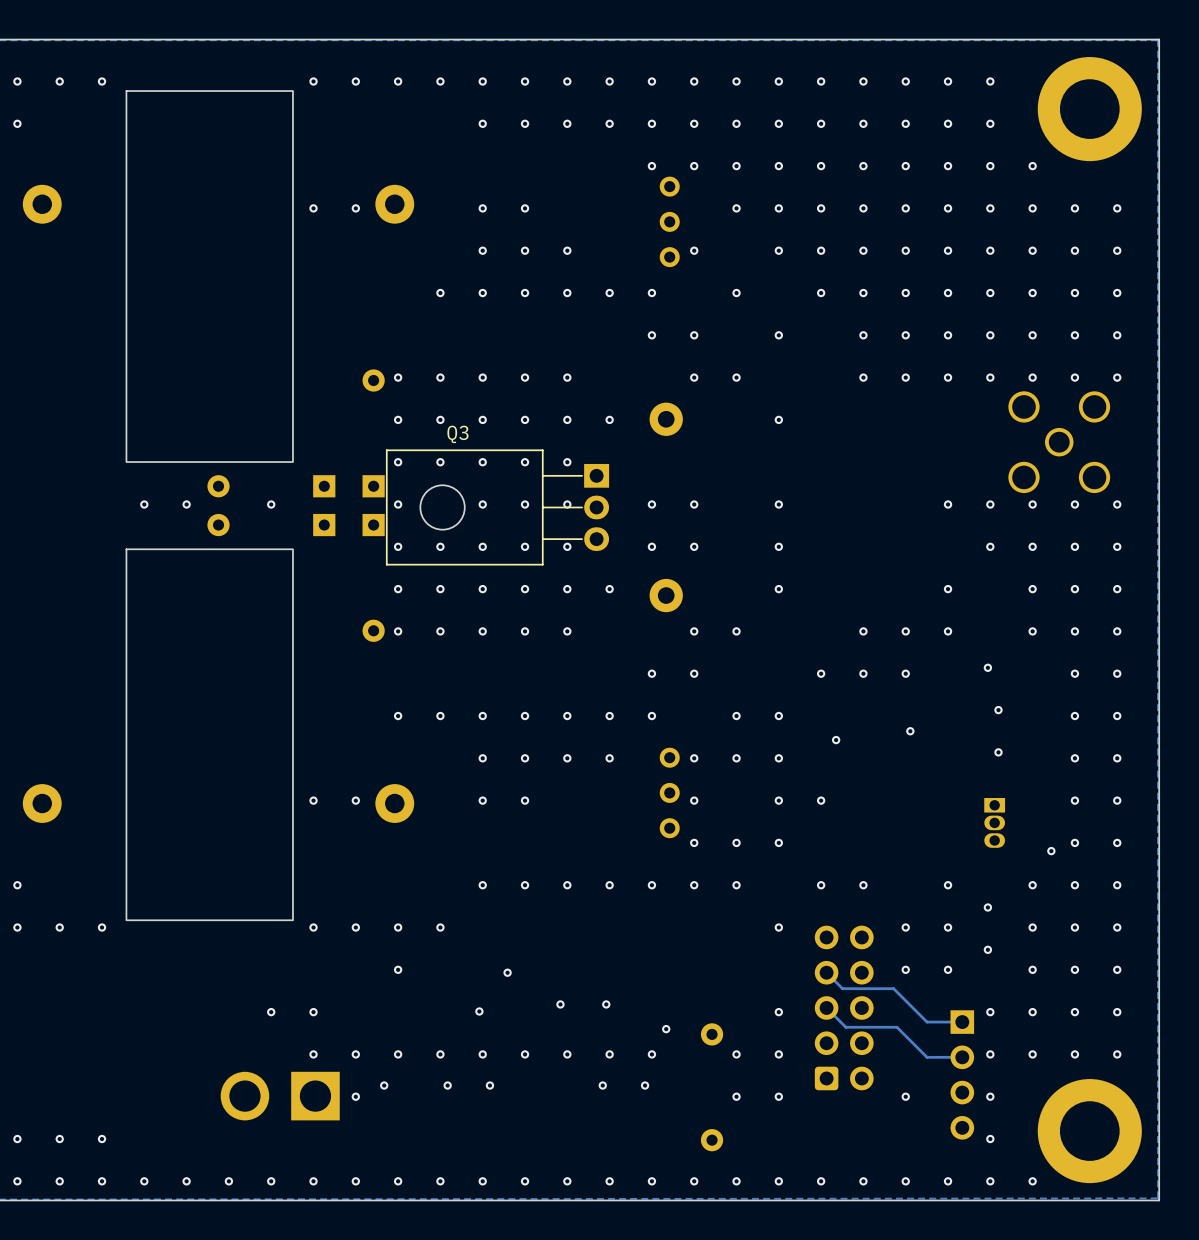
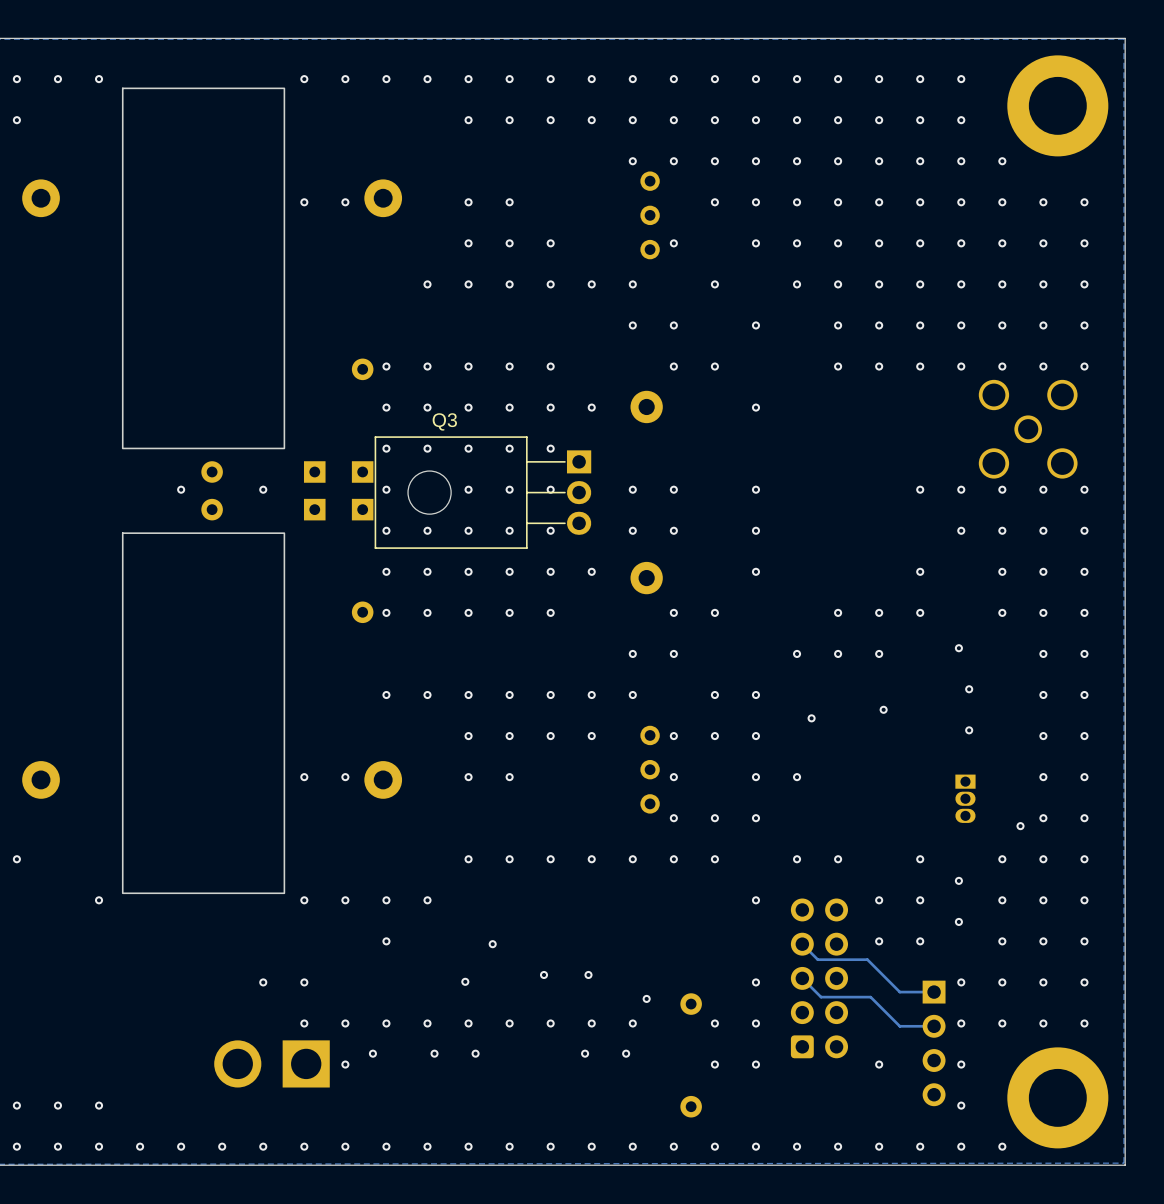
via: (144, 504) -> none
via: (17, 927) -> none
via: (59, 927) -> none

